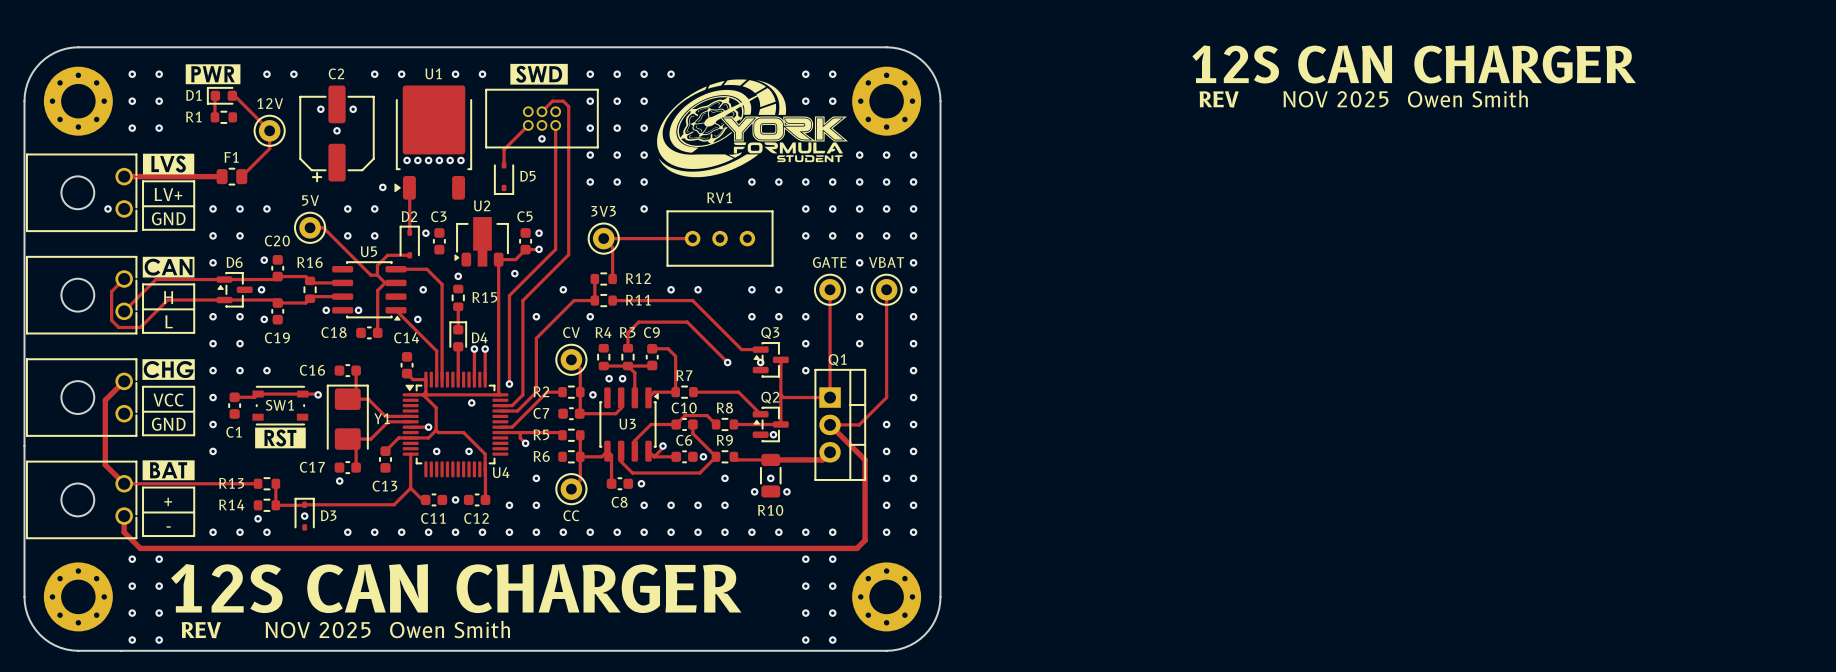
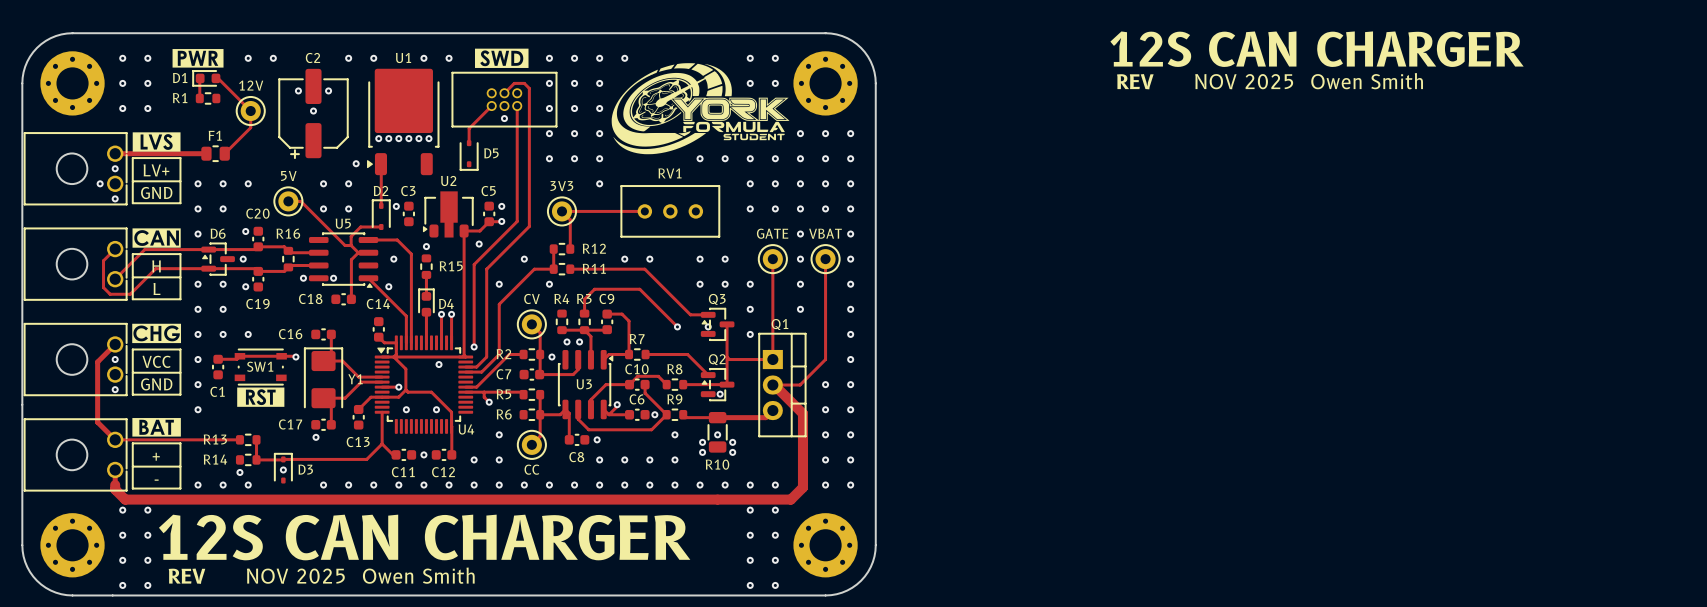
via: none -> (115, 168)
via: none -> (115, 198)
via: none -> (115, 359)
track: (830, 424) (865, 459) (865, 540) (856, 548) (140, 548) (124, 532) -> (717, 499) (125, 499) (115, 489) (115, 485)
track: none -> (772, 385) (802, 413) (802, 487) (790, 499) (718, 499)
via: none -> (115, 389)
via: none -> (702, 442)
via: none -> (732, 442)
via: (754, 491) -> none
via: (786, 491) -> none
via: none -> (702, 452)
via: none -> (732, 452)

